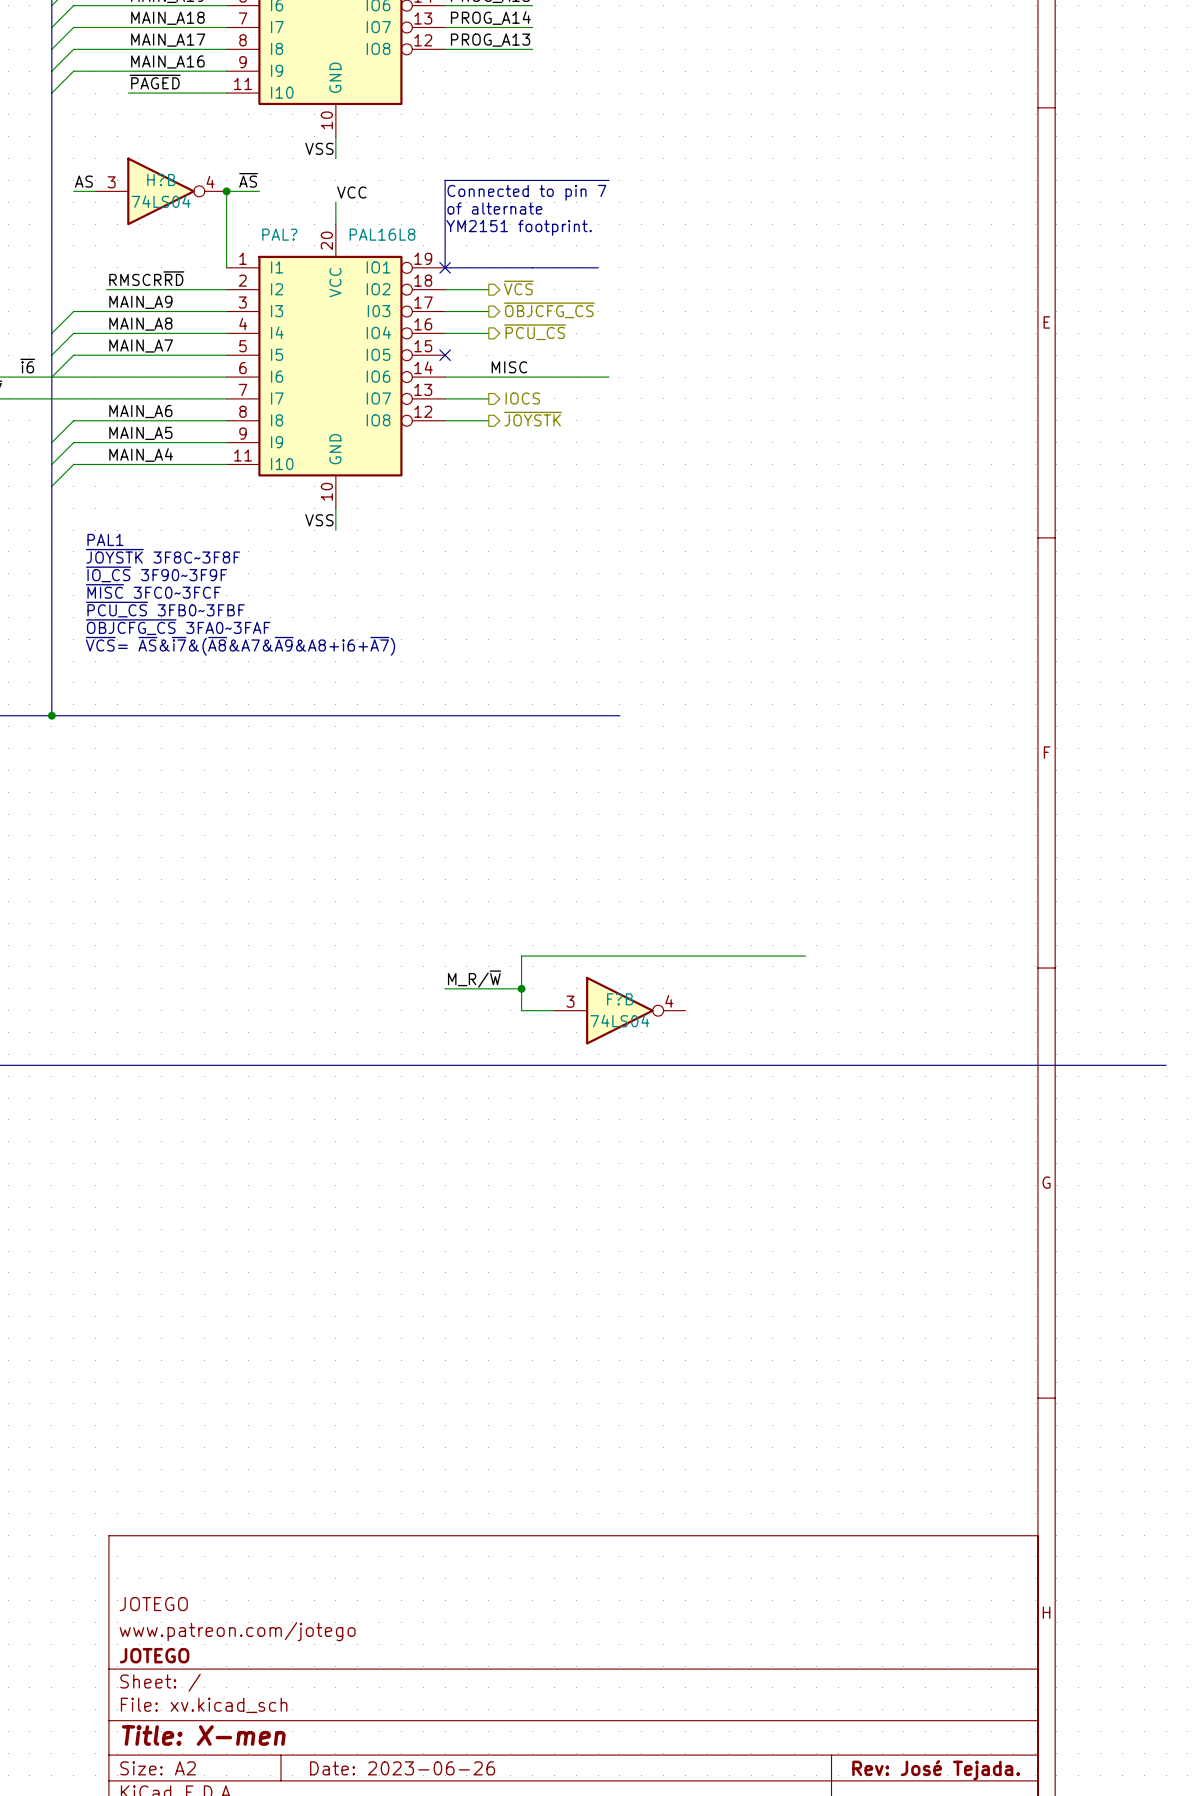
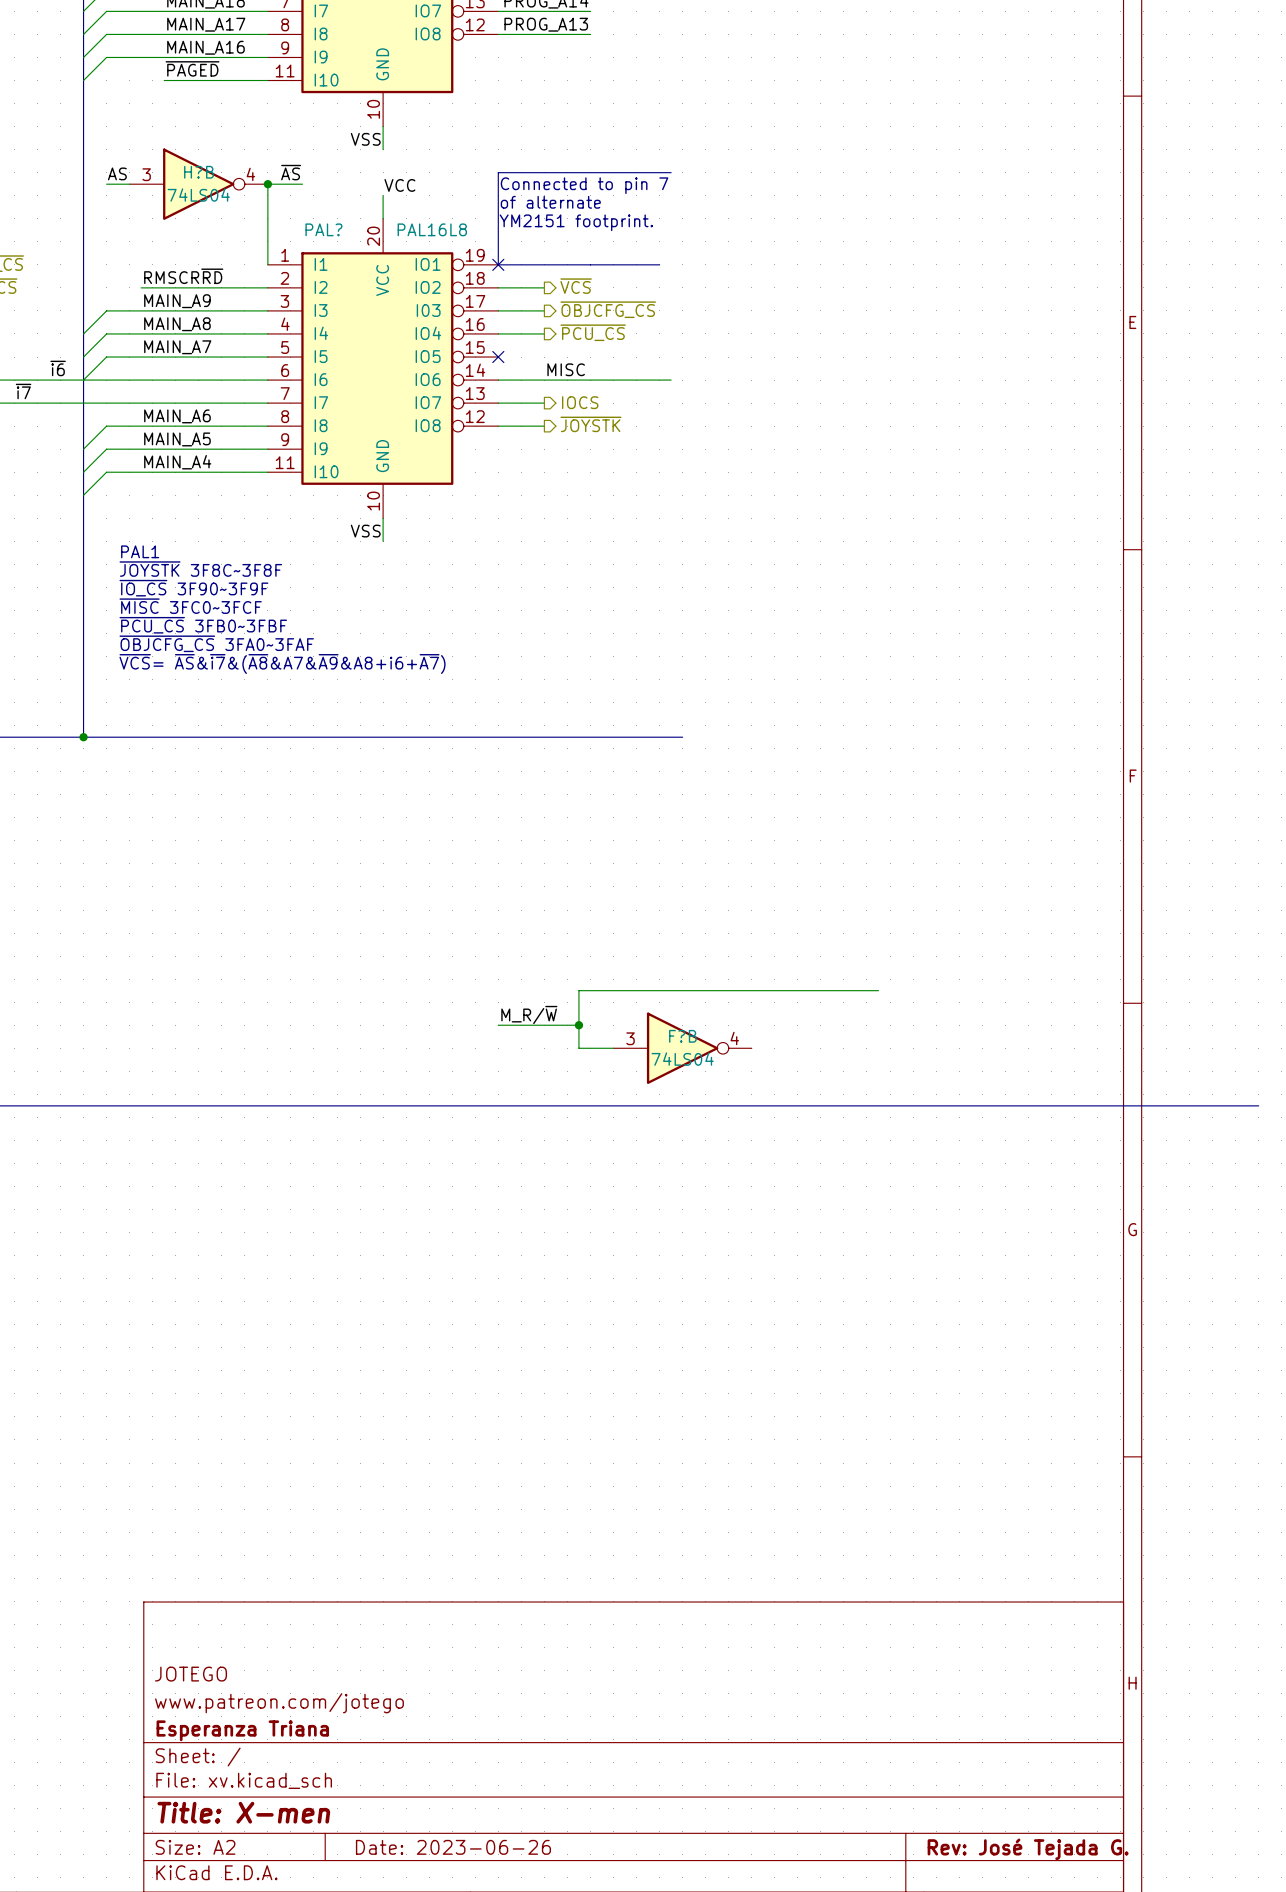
title block: JOTEGO (154, 1655) -> Esperanza Triana (242, 1730)
title block: Rev: José Tejada. (936, 1770) -> Rev: José Tejada G. (1028, 1849)

